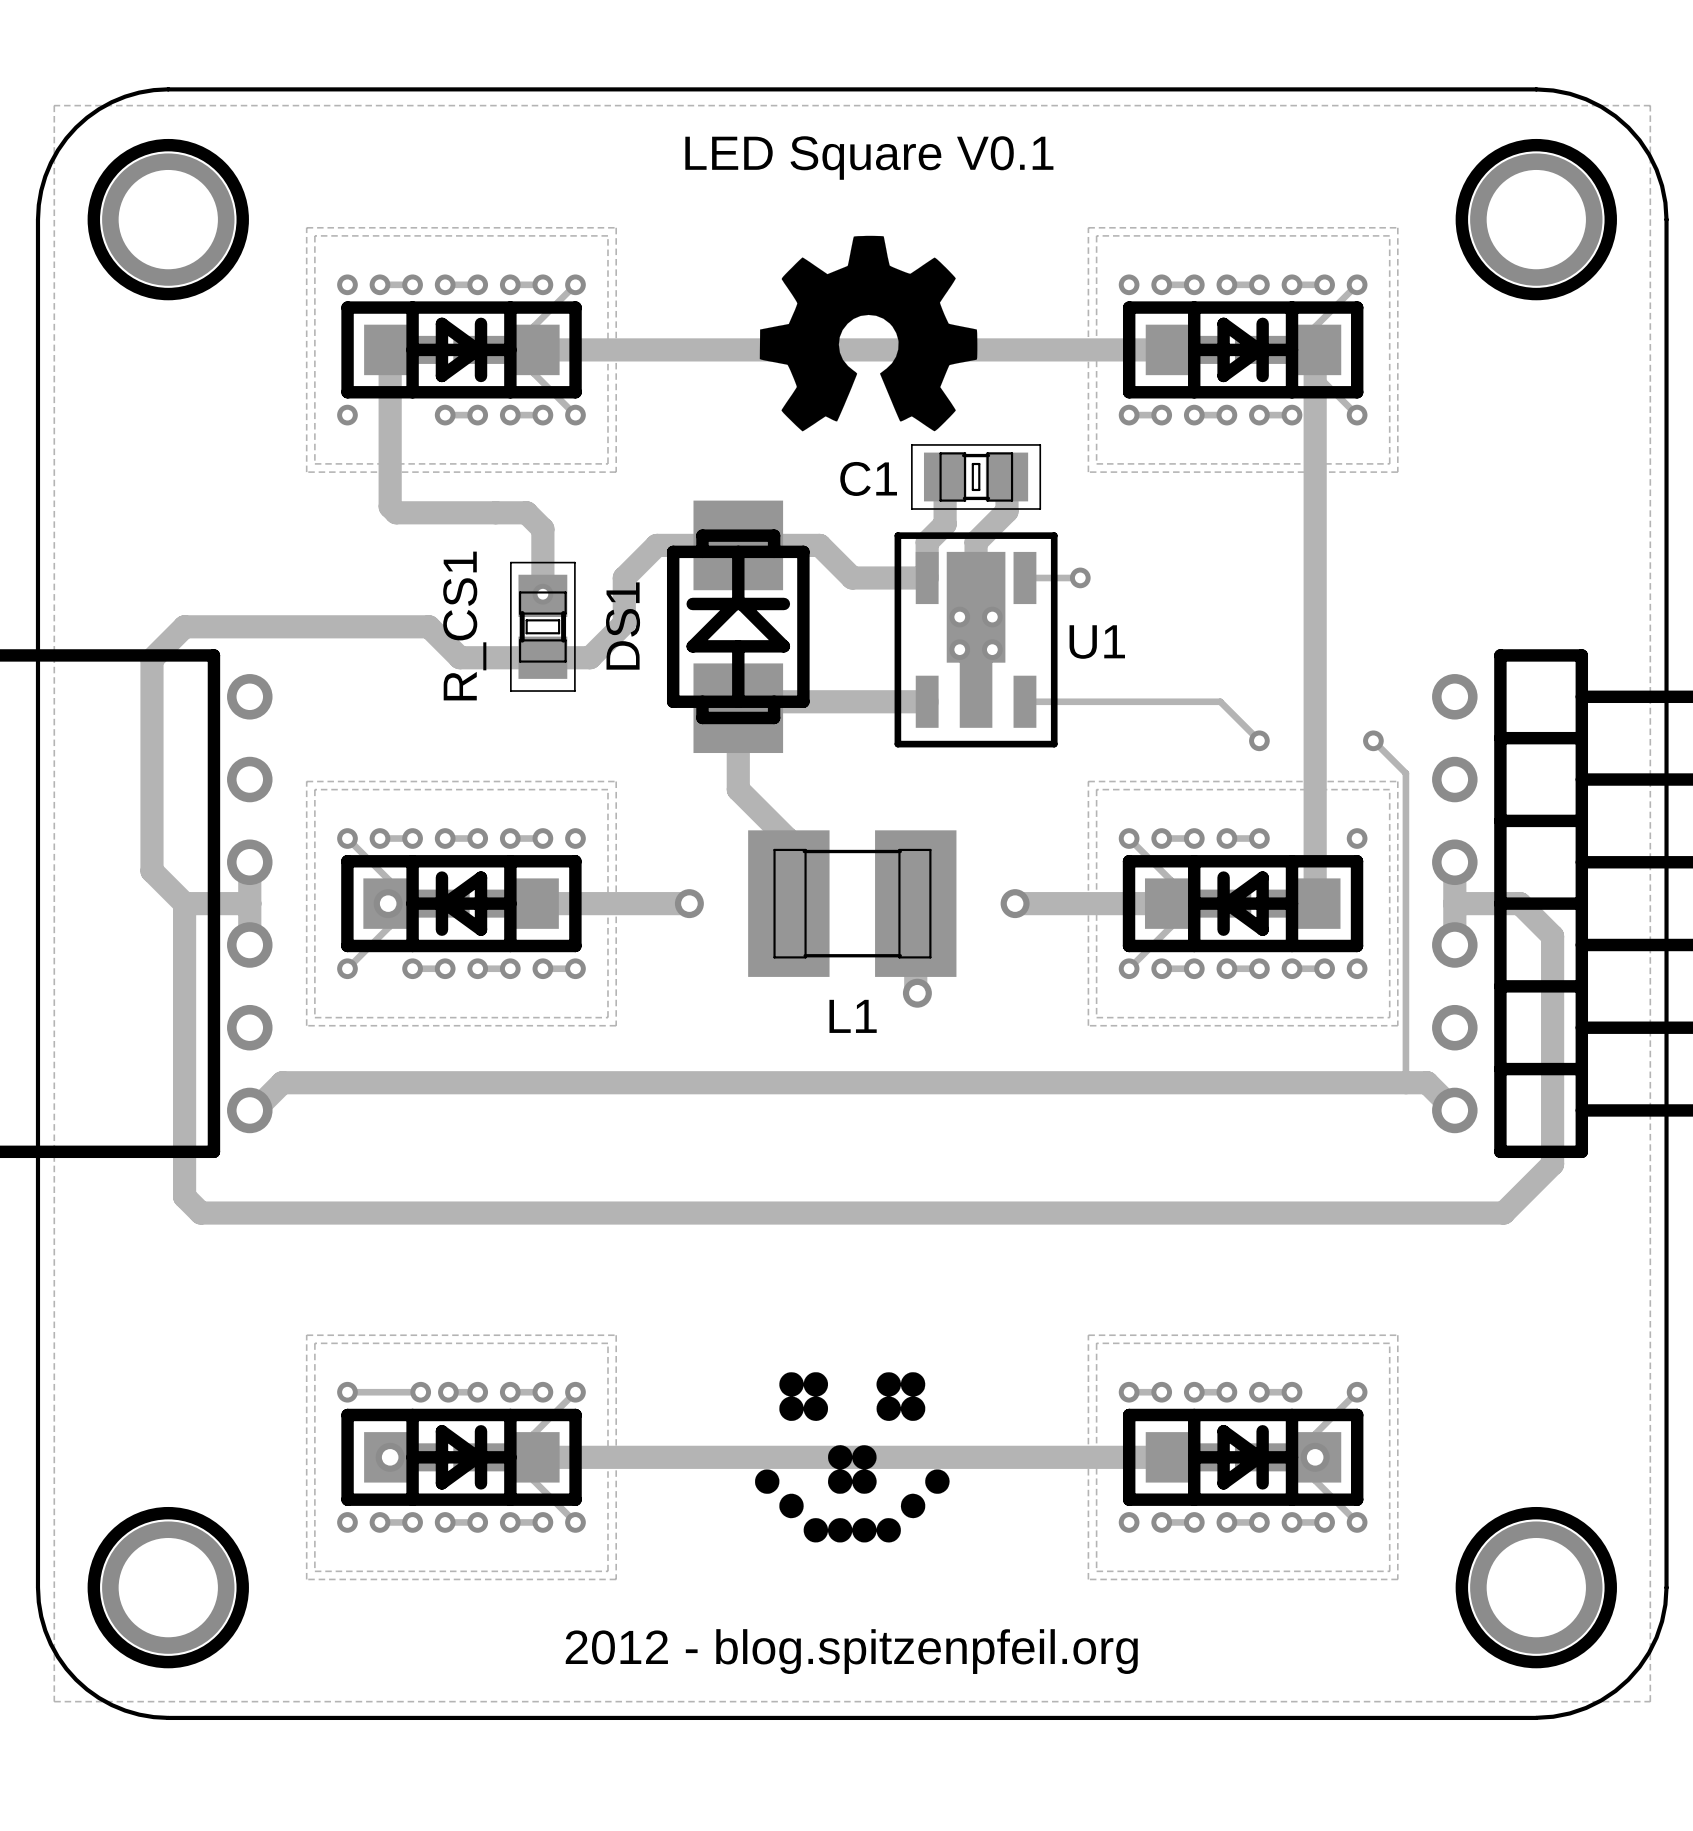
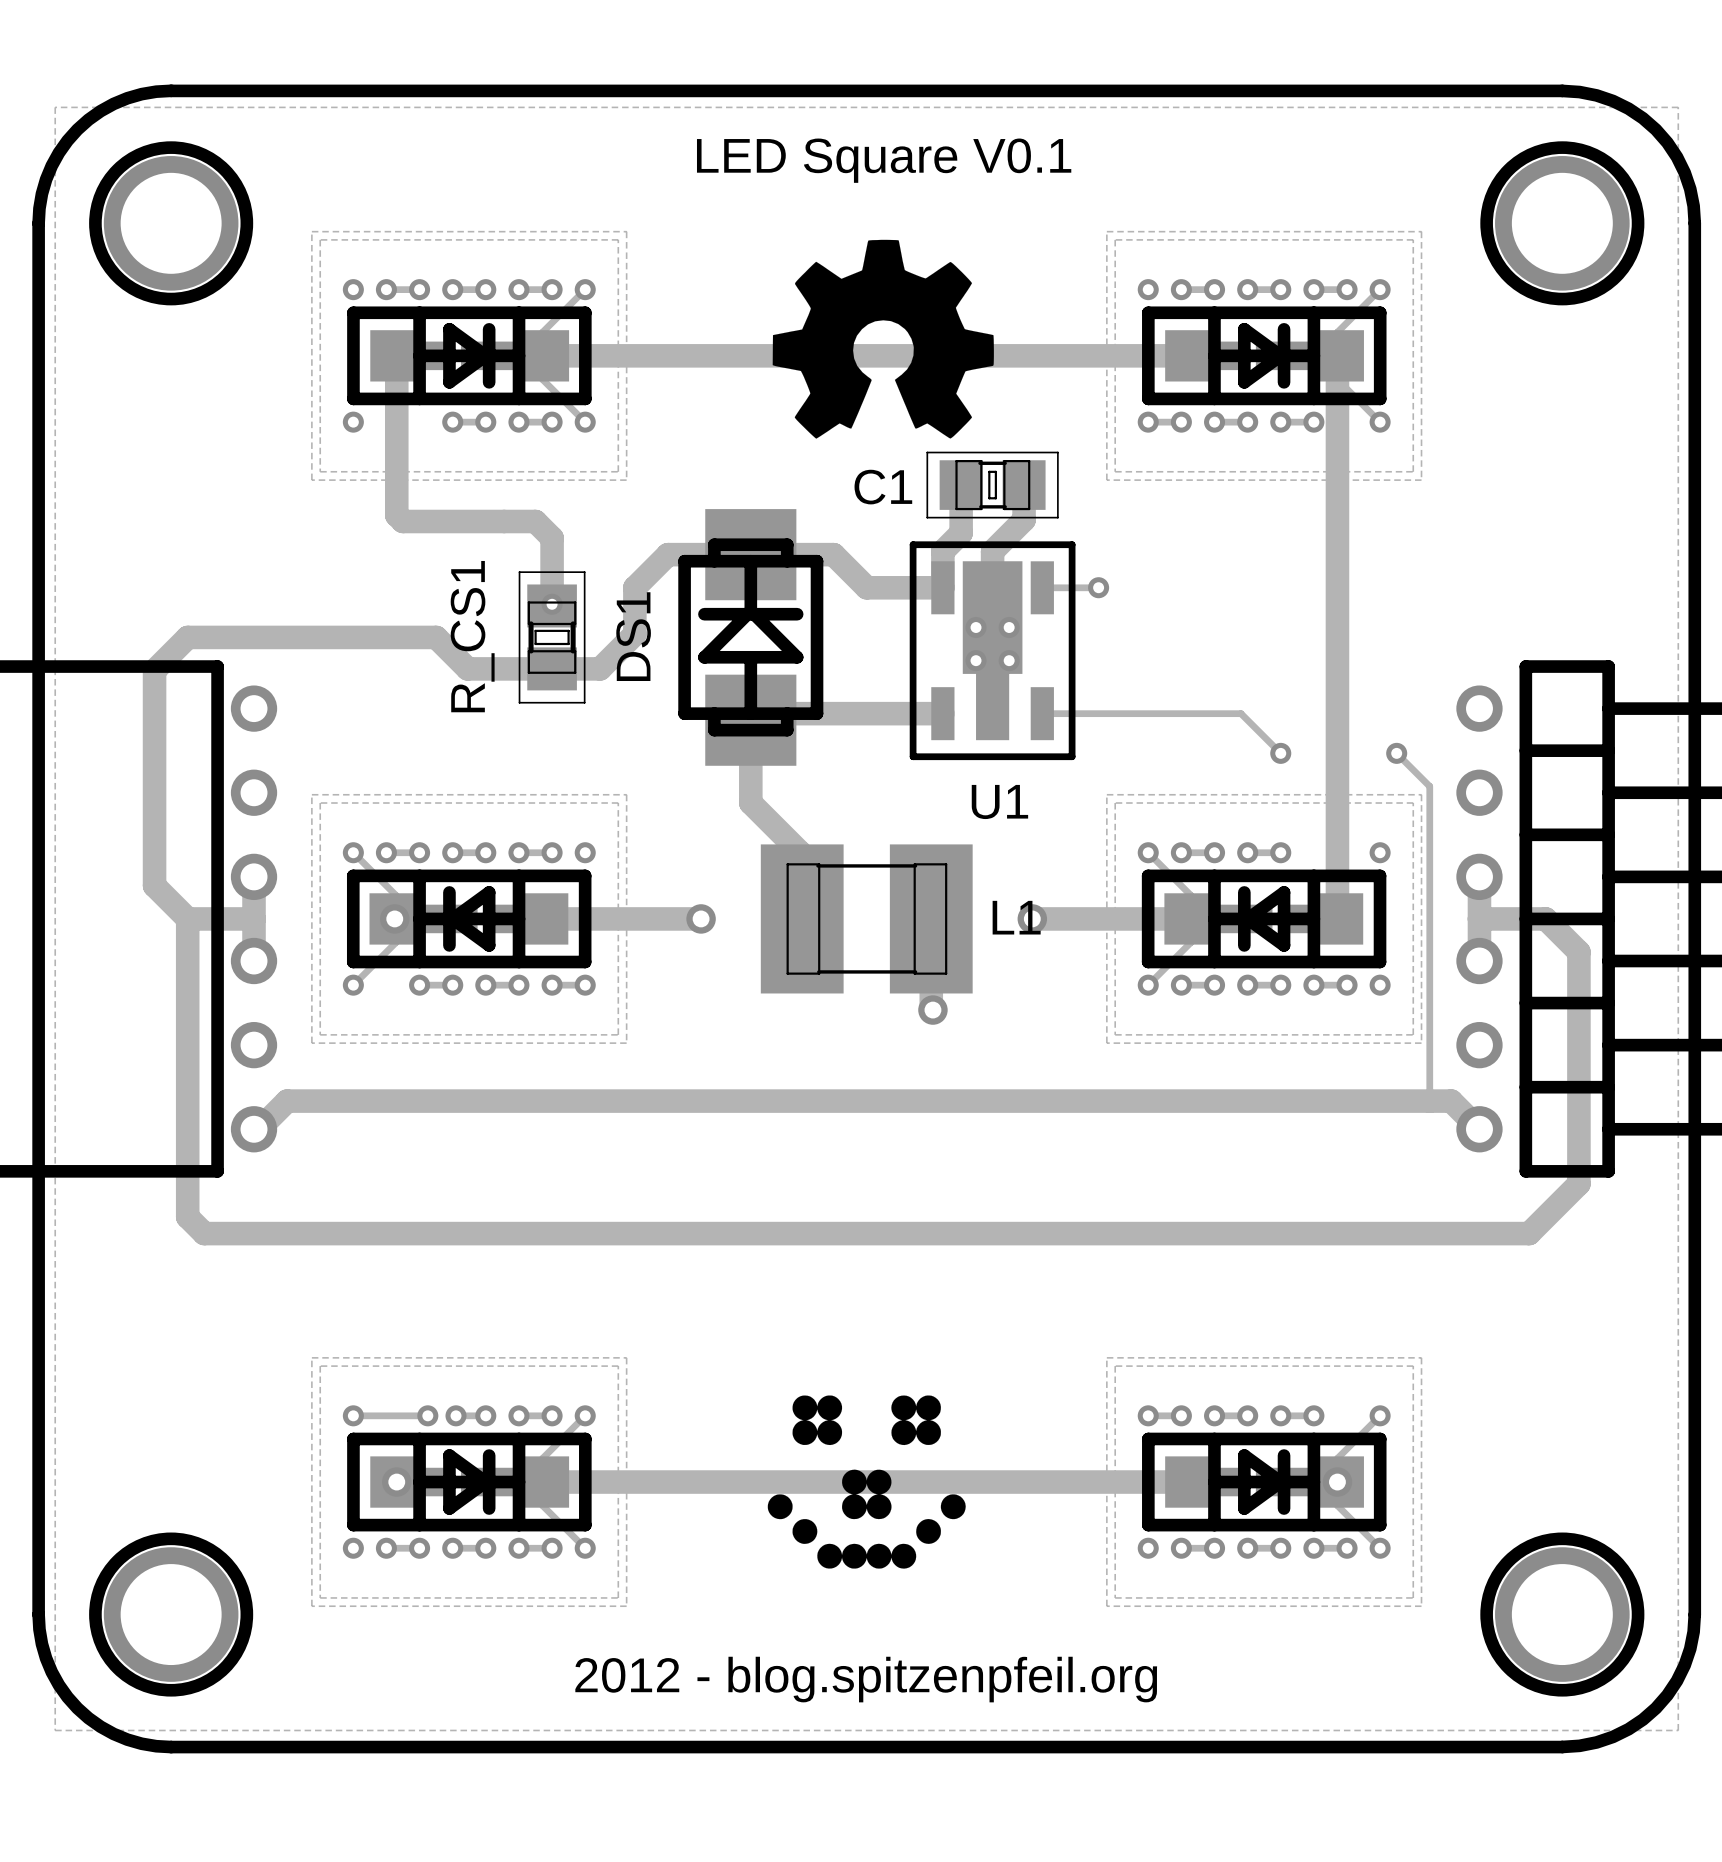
board edge width: thin (168, 89) (1536, 89) (1570, 93) (1586, 99) (1601, 106) (1628, 127) (1649, 154) (1656, 169) (1662, 185) (1666, 219) (1666, 1587) (1662, 1621) (1656, 1637) (1649, 1652) (1628, 1679) (1601, 1700) (1586, 1707) (1570, 1713) (1536, 1717) (168, 1717) (153, 1717) (125, 1710) (98, 1697) (76, 1679) (57, 1656) (50, 1644) (41, 1616) (37, 1587) (38, 205) (45, 176) (50, 163) (66, 138) (76, 127) (98, 109) (125, 96) (153, 90) (168, 89) -> thick (171, 90) (1562, 90) (1596, 95) (1613, 100) (1628, 108) (1655, 129) (1677, 157) (1684, 172) (1690, 189) (1694, 223) (1694, 1614) (1690, 1648) (1684, 1665) (1677, 1680) (1655, 1708) (1628, 1729) (1613, 1736) (1596, 1742) (1562, 1746) (171, 1747) (156, 1746) (127, 1739) (100, 1726) (77, 1708) (58, 1685) (51, 1672) (41, 1644) (38, 1614) (39, 208) (46, 179) (51, 165) (67, 140) (77, 129) (100, 111) (127, 98) (156, 91) (171, 90)
U1 name position: U1 (1097, 642) -> U1 (999, 801)
L1 name position: L1 (853, 1016) -> L1 (1016, 917)

